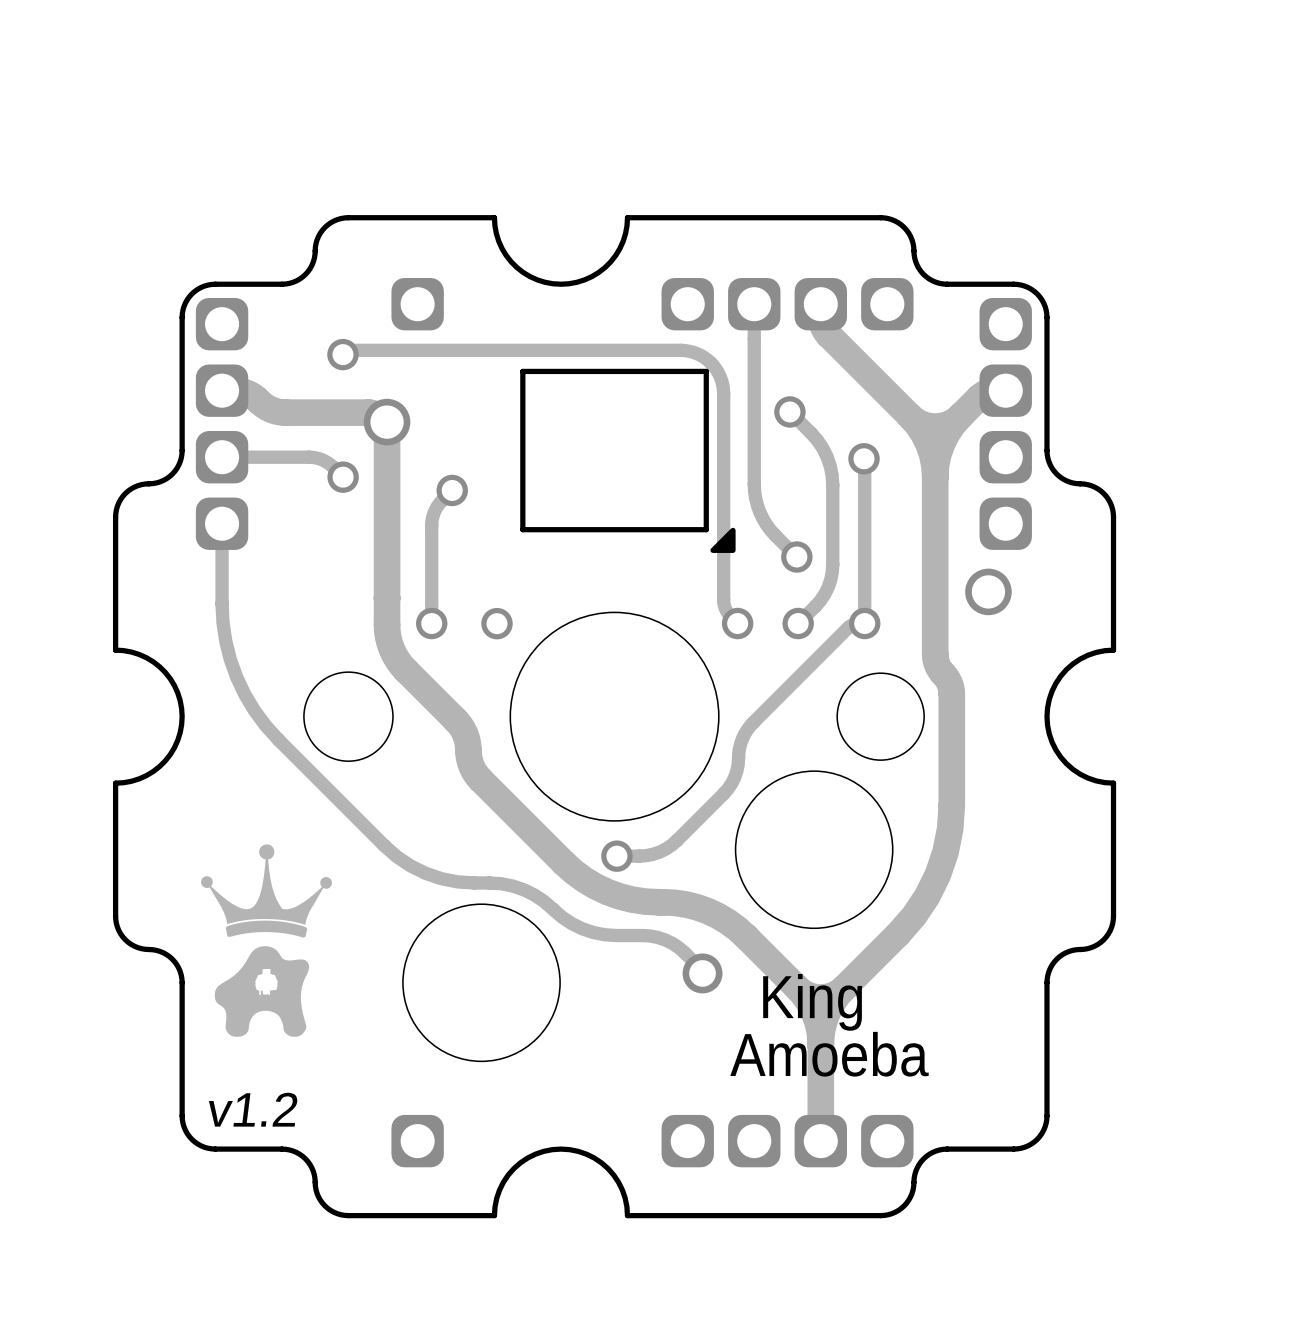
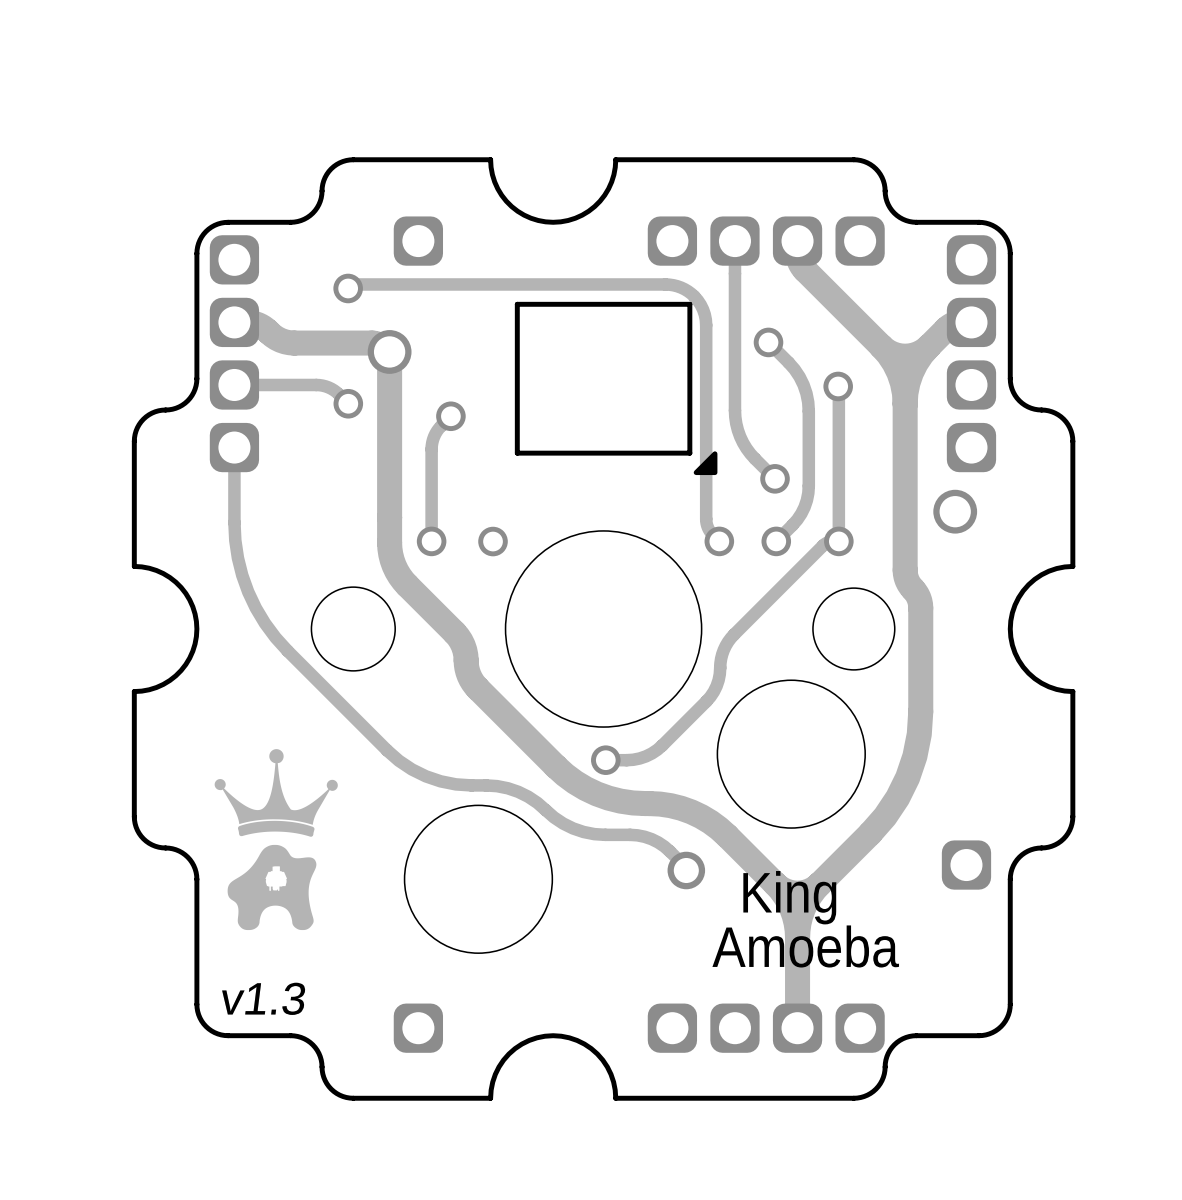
part: none -> (966, 865)
text: v1.2 (253, 1109) -> none
text: none -> v1.3 (263, 998)

